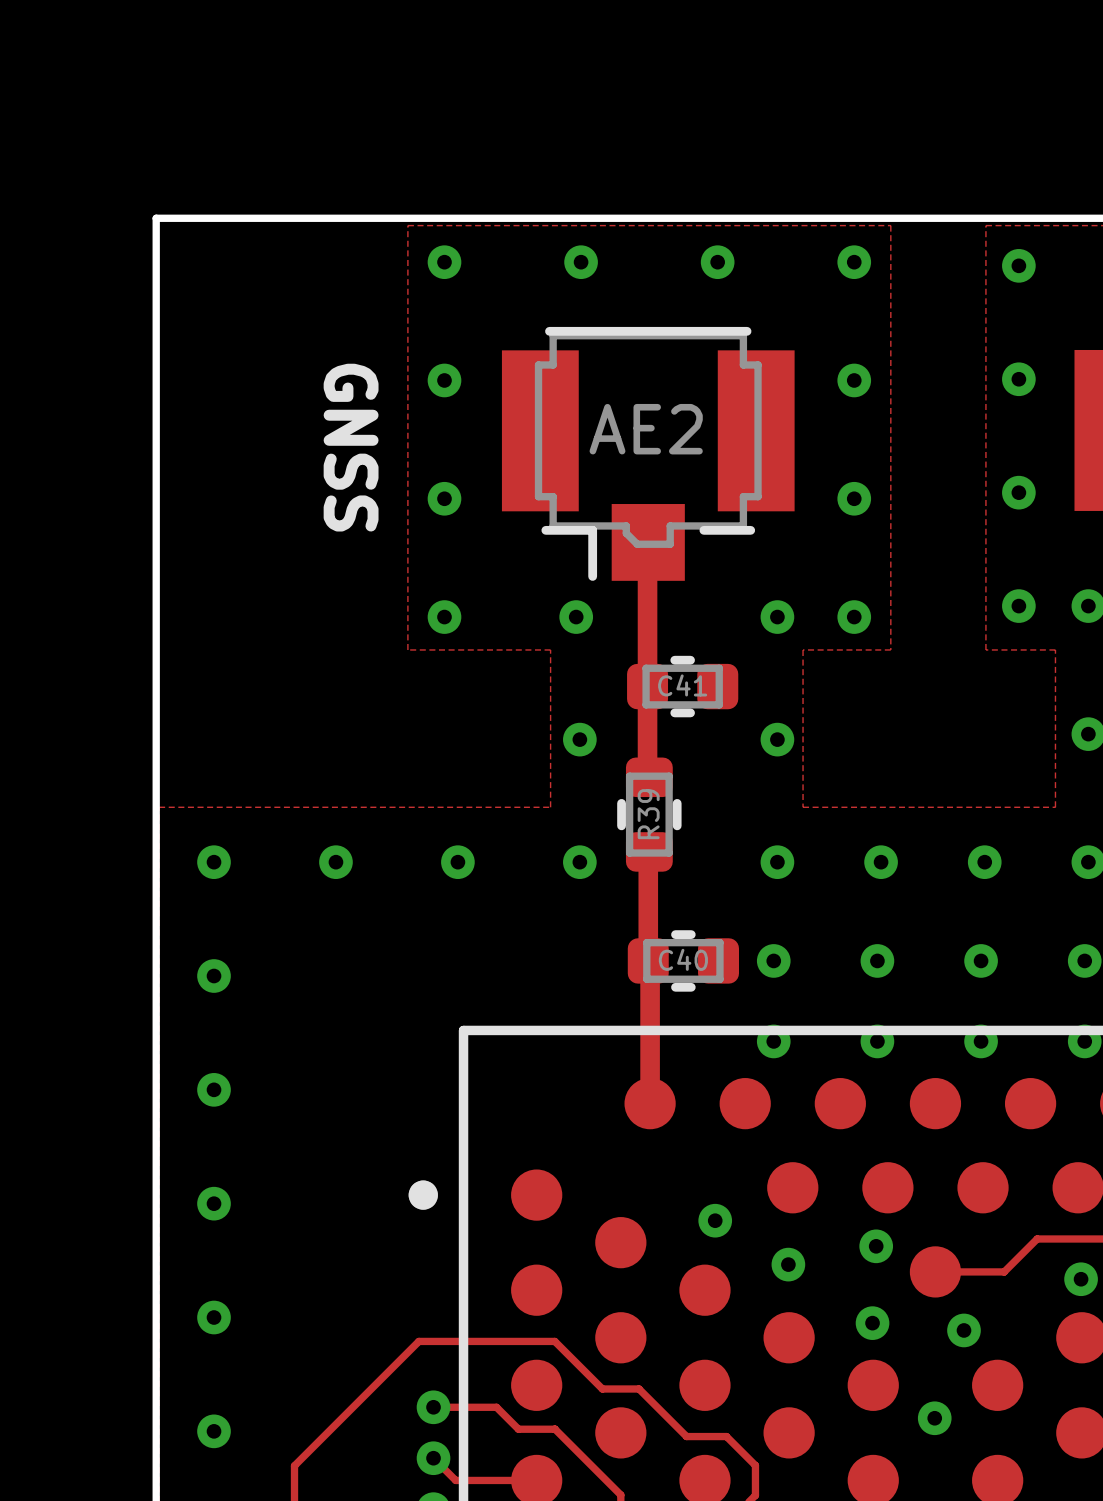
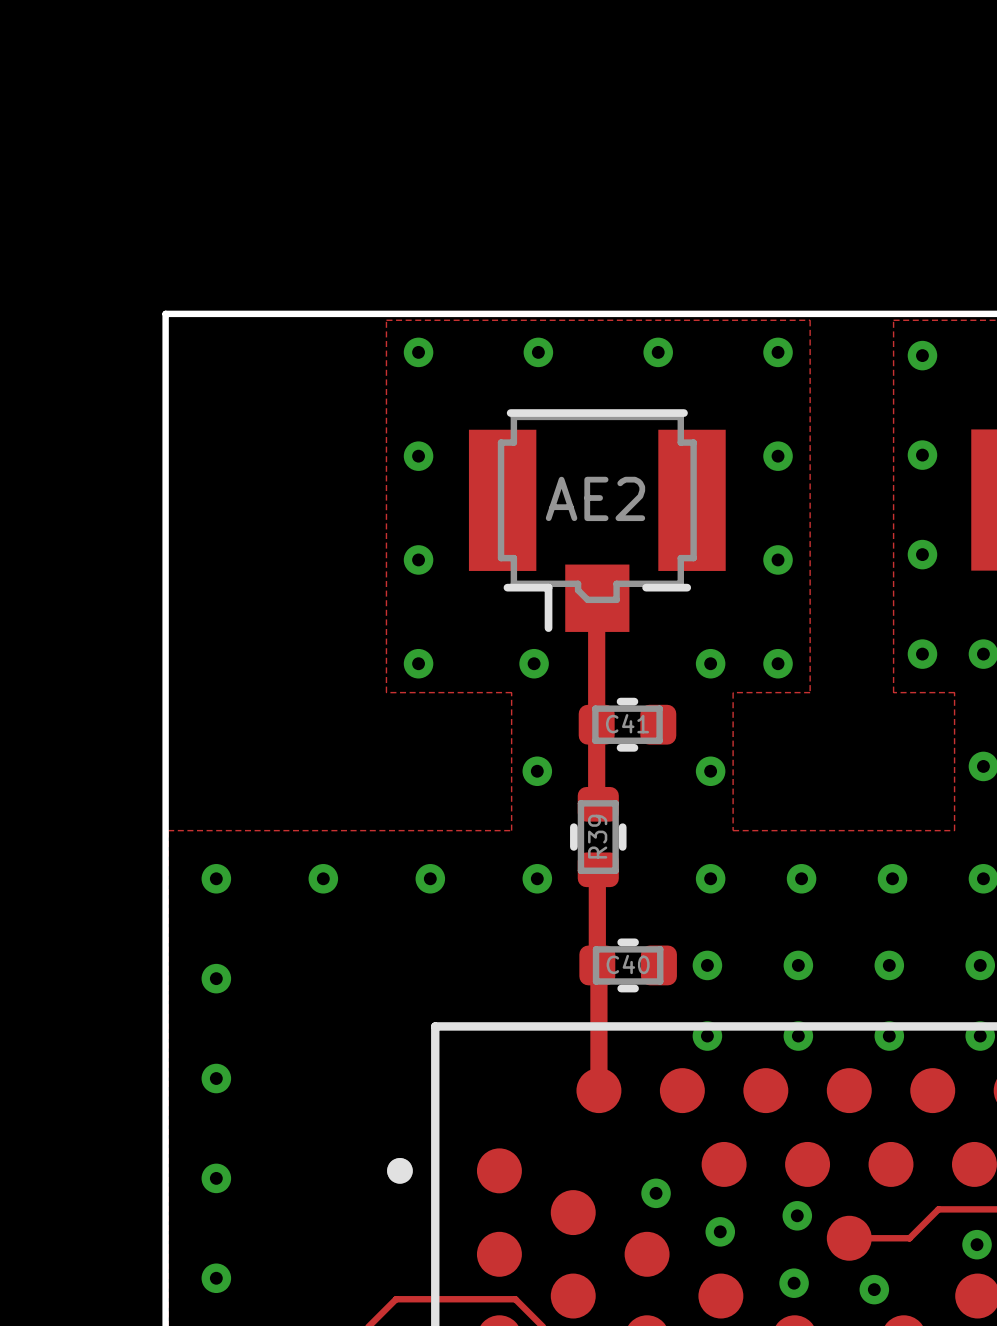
text: GNSS (351, 447) -> none

